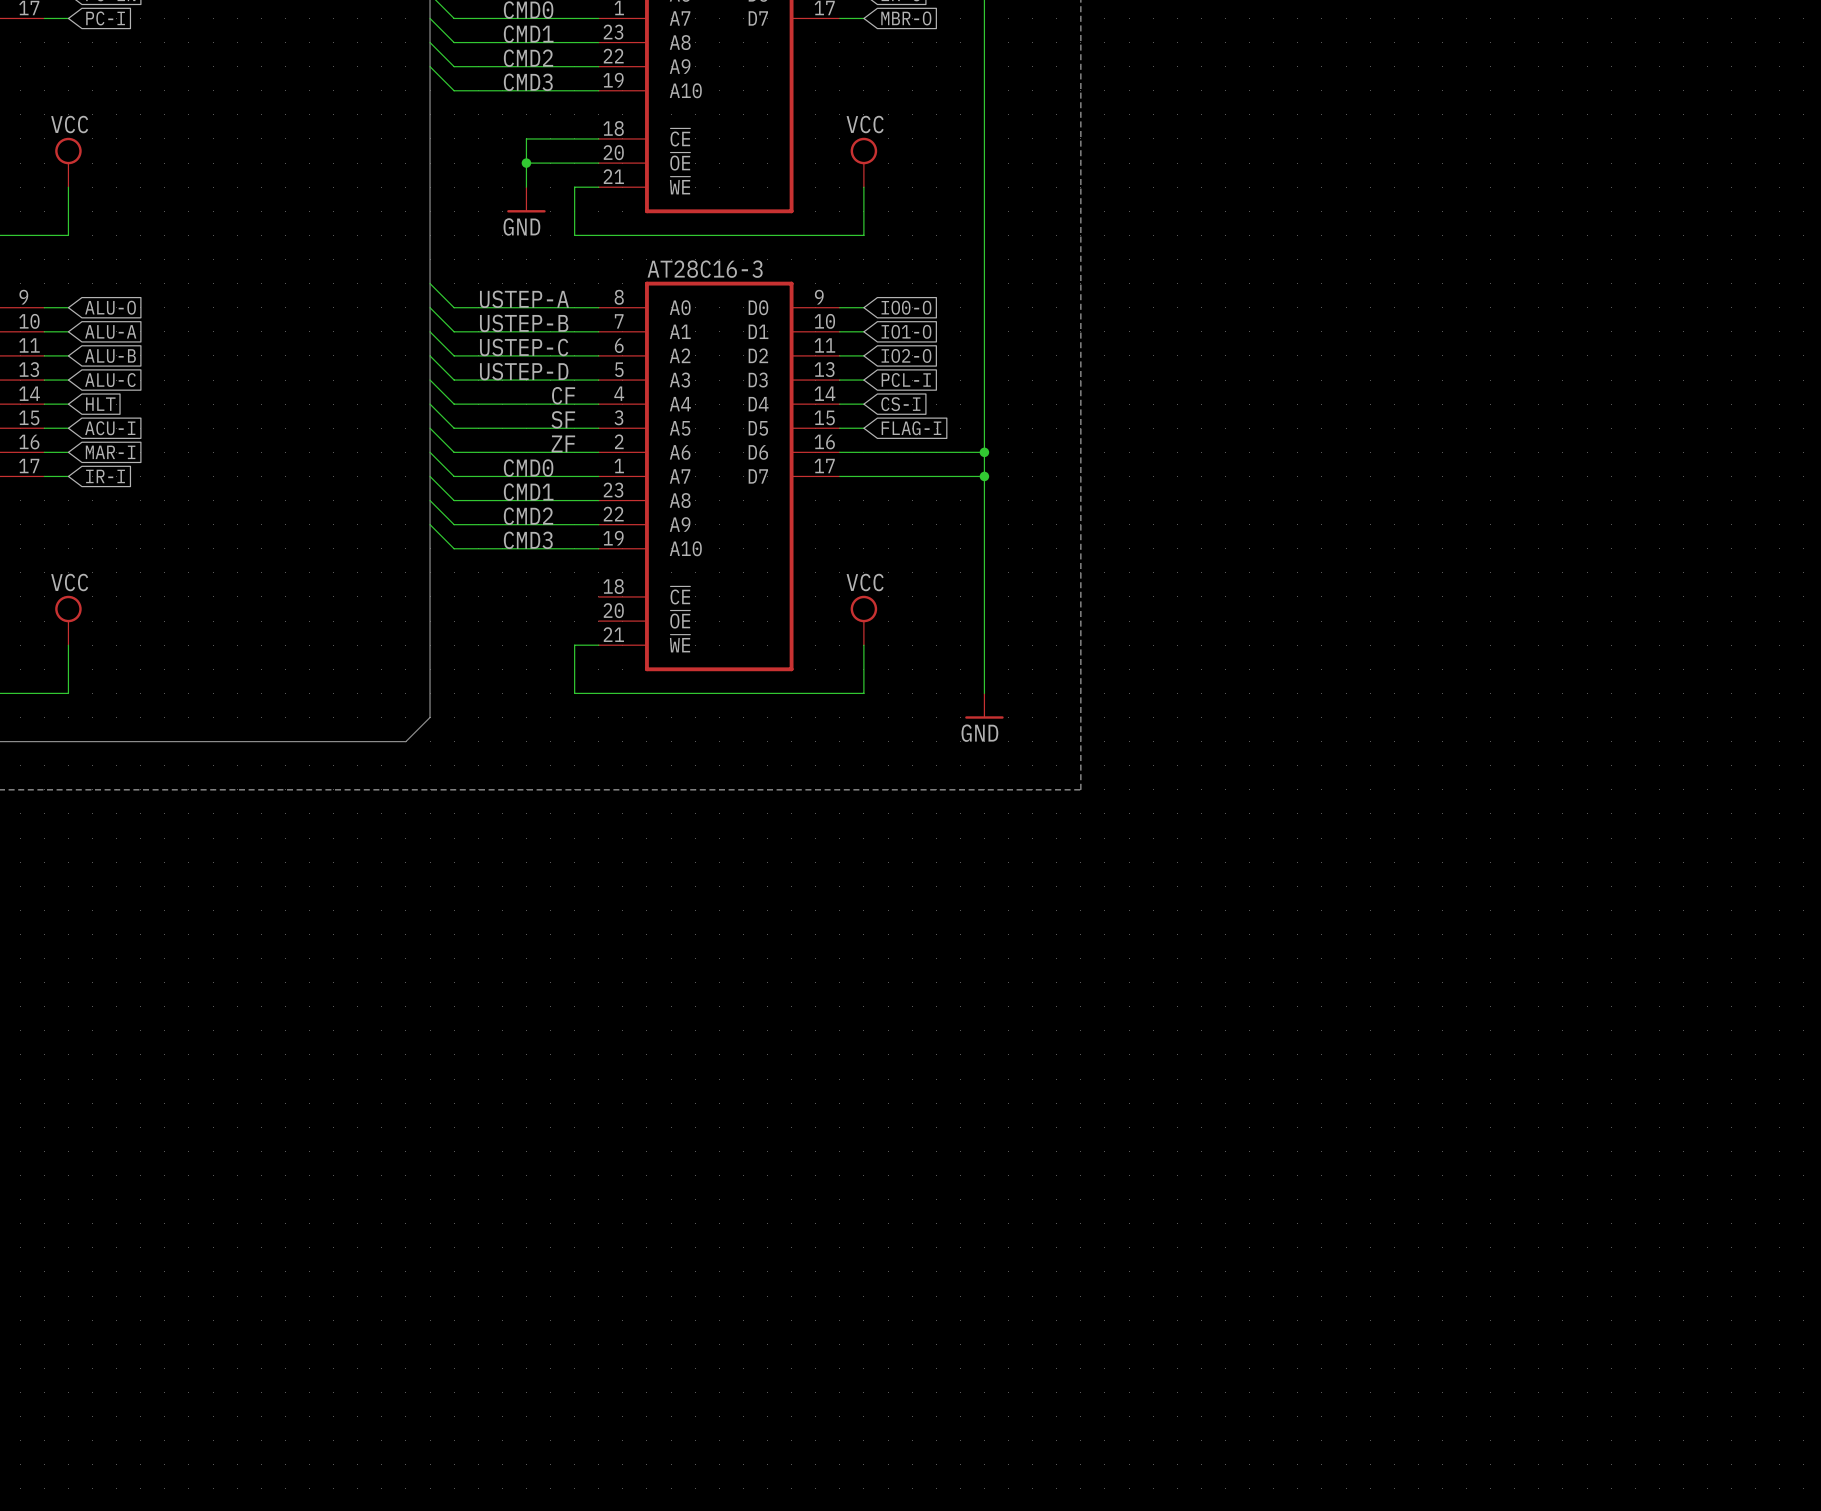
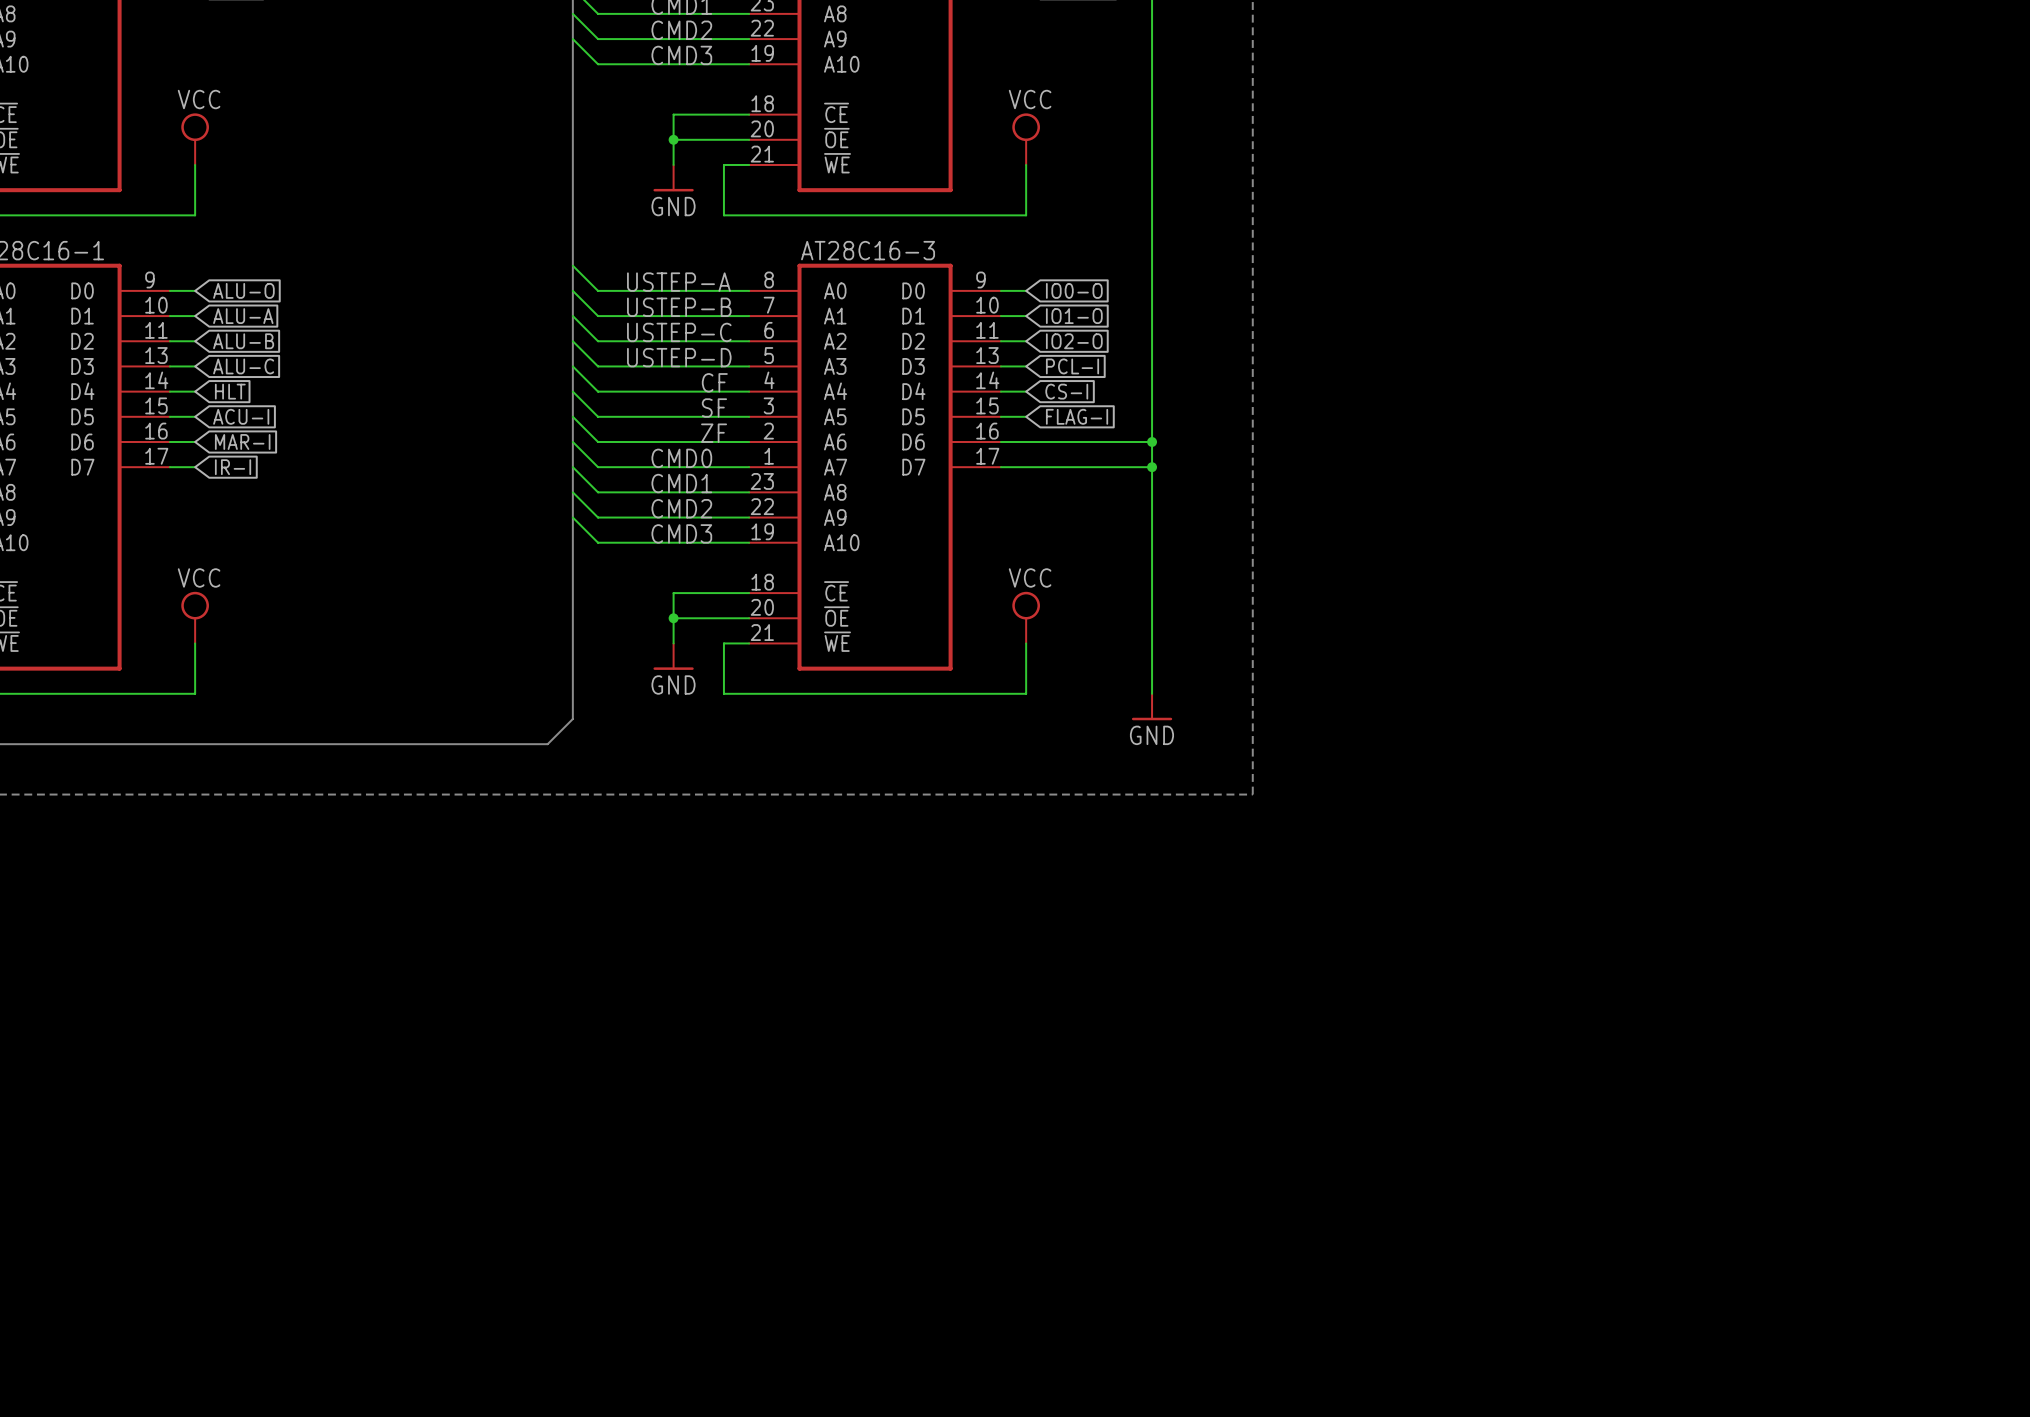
wire: none -> (749, 593) (673, 593) (673, 643)
wire: none -> (673, 618) (749, 618)
junction: none -> (673, 618)
power symbol: none -> GND (673, 656)

